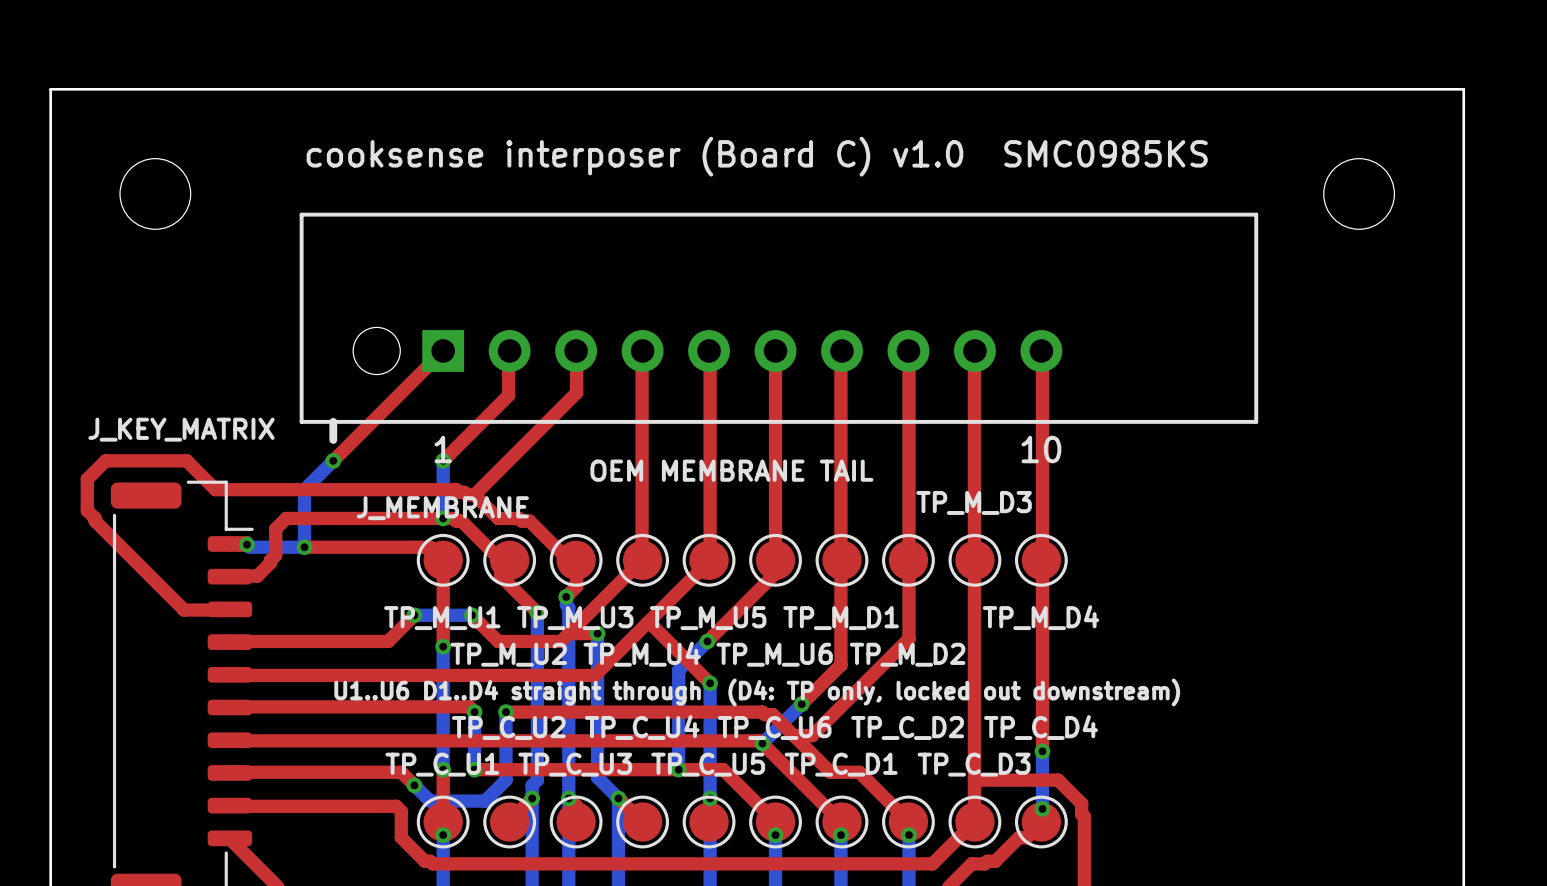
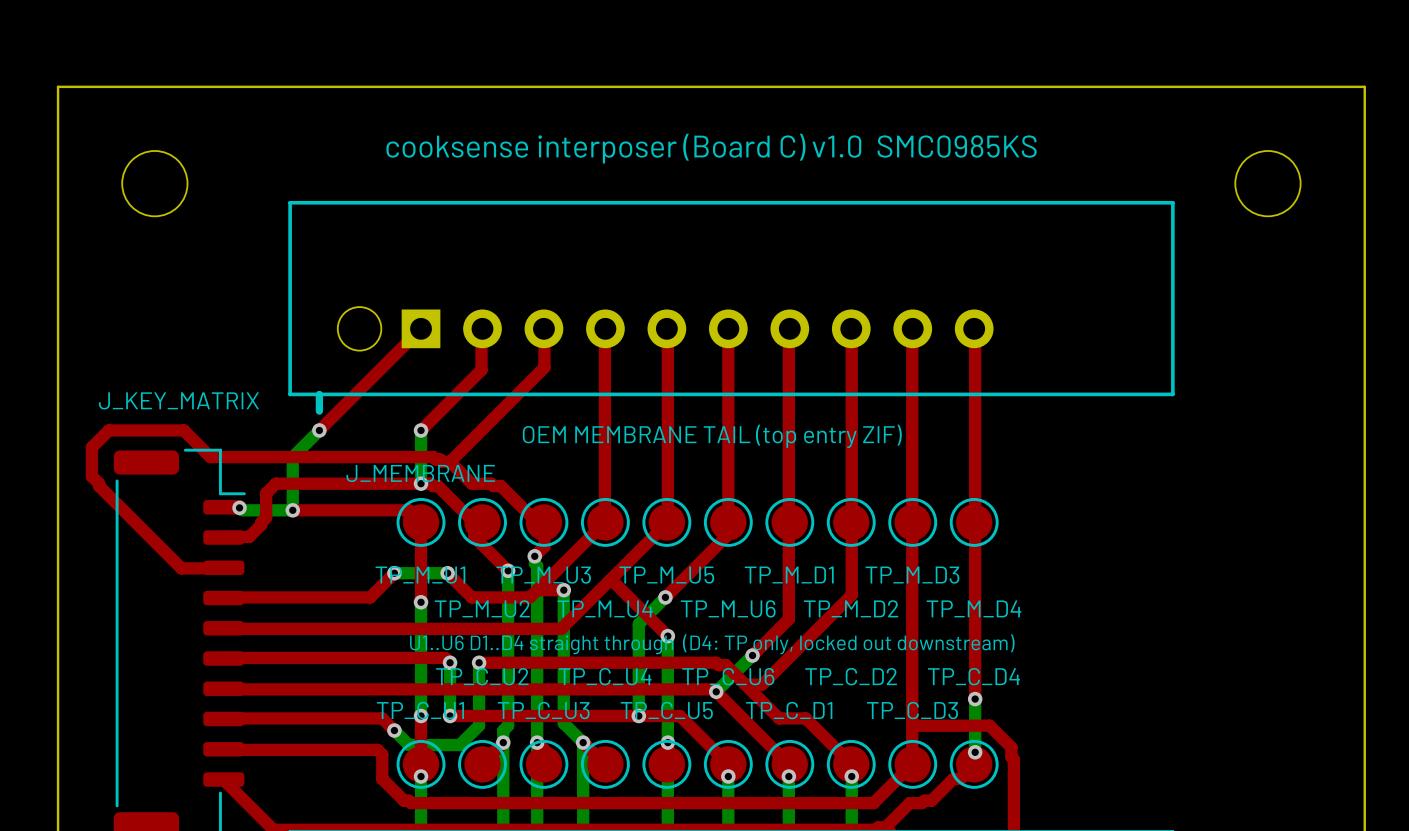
J_MEMBRANE text: 1 (443, 449) -> none
J_MEMBRANE text: 10 (1041, 449) -> none
text: OEM MEMBRANE TAIL (731, 470) -> OEM MEMBRANE TAIL (top entry ZIF) (712, 436)
TP_M_D3 name position: TP_M_D3 (974, 502) -> TP_M_D3 (912, 575)
TP_M_D4 name position: TP_M_D4 (1040, 617) -> TP_M_D4 (973, 608)

